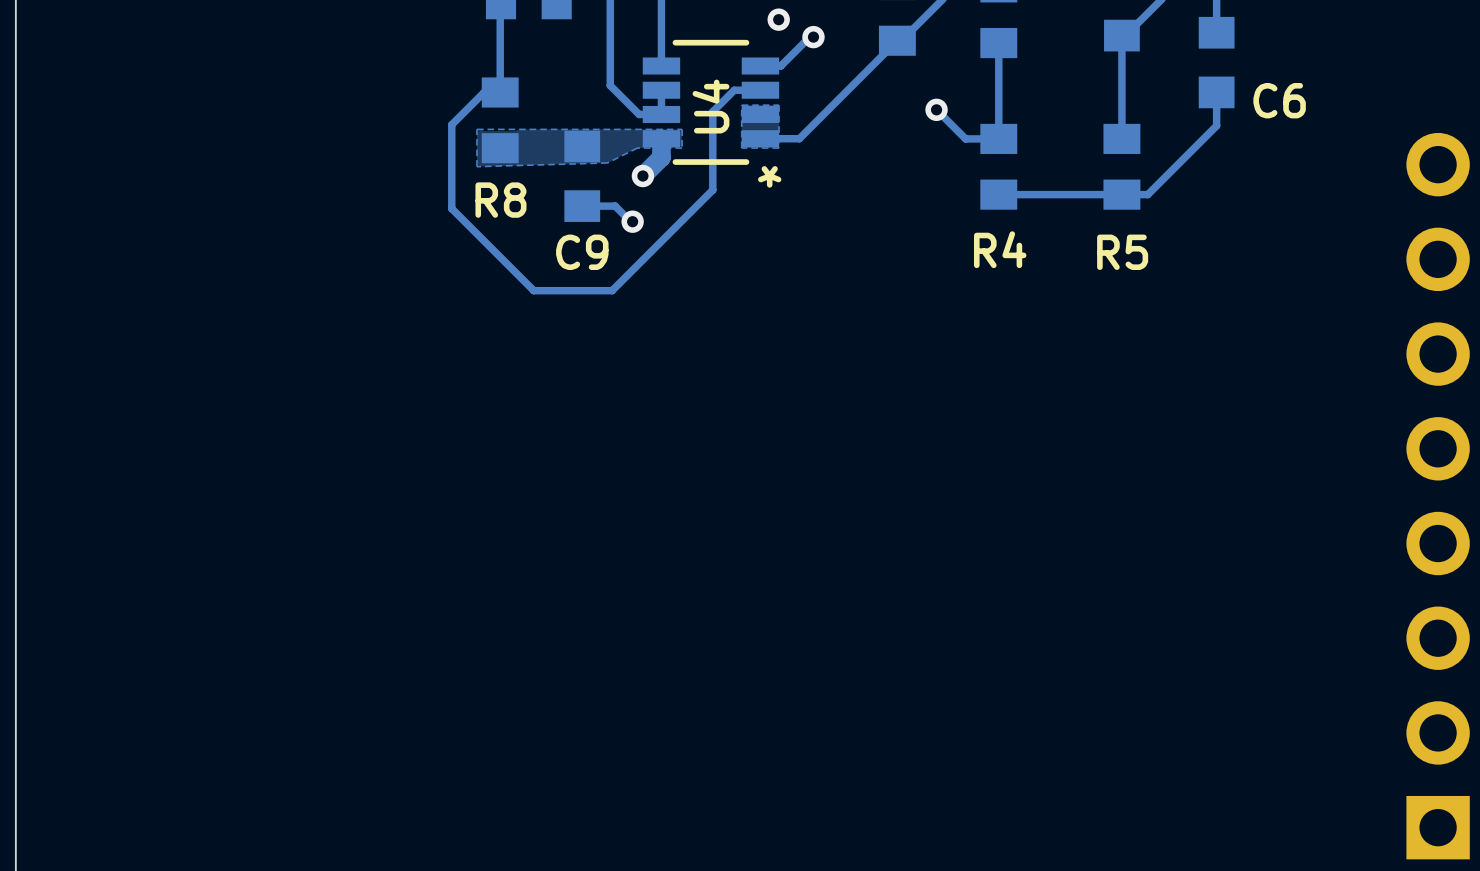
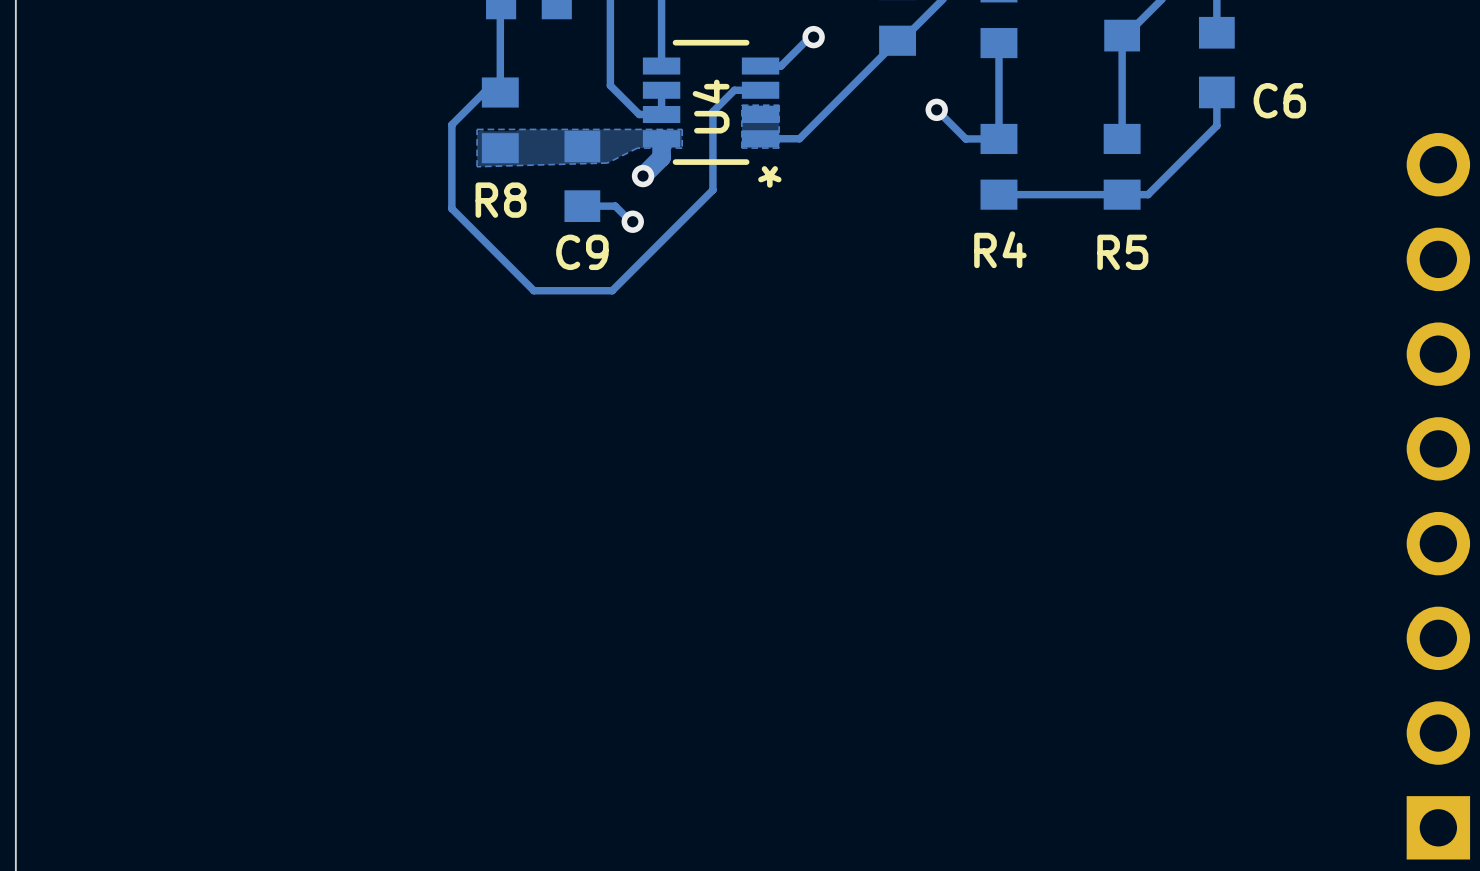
via: (778, 19) -> none

